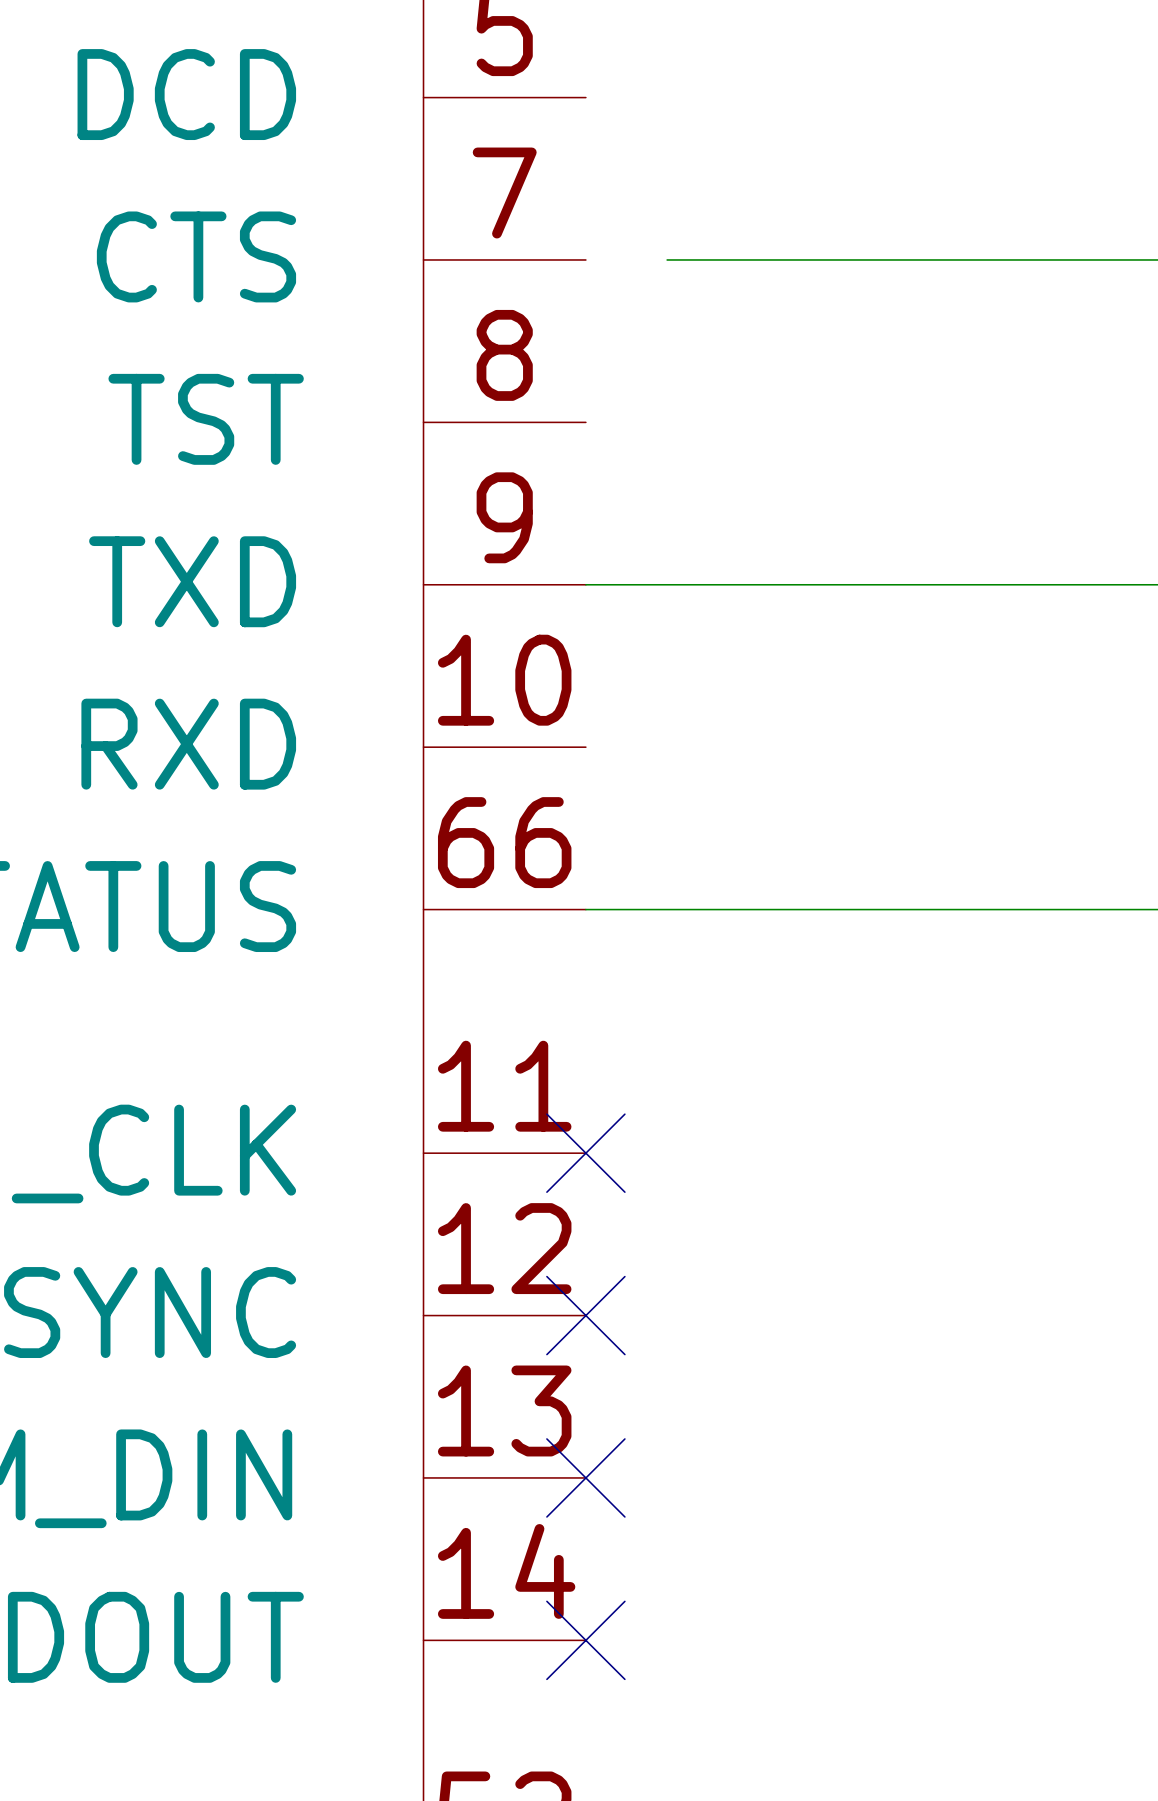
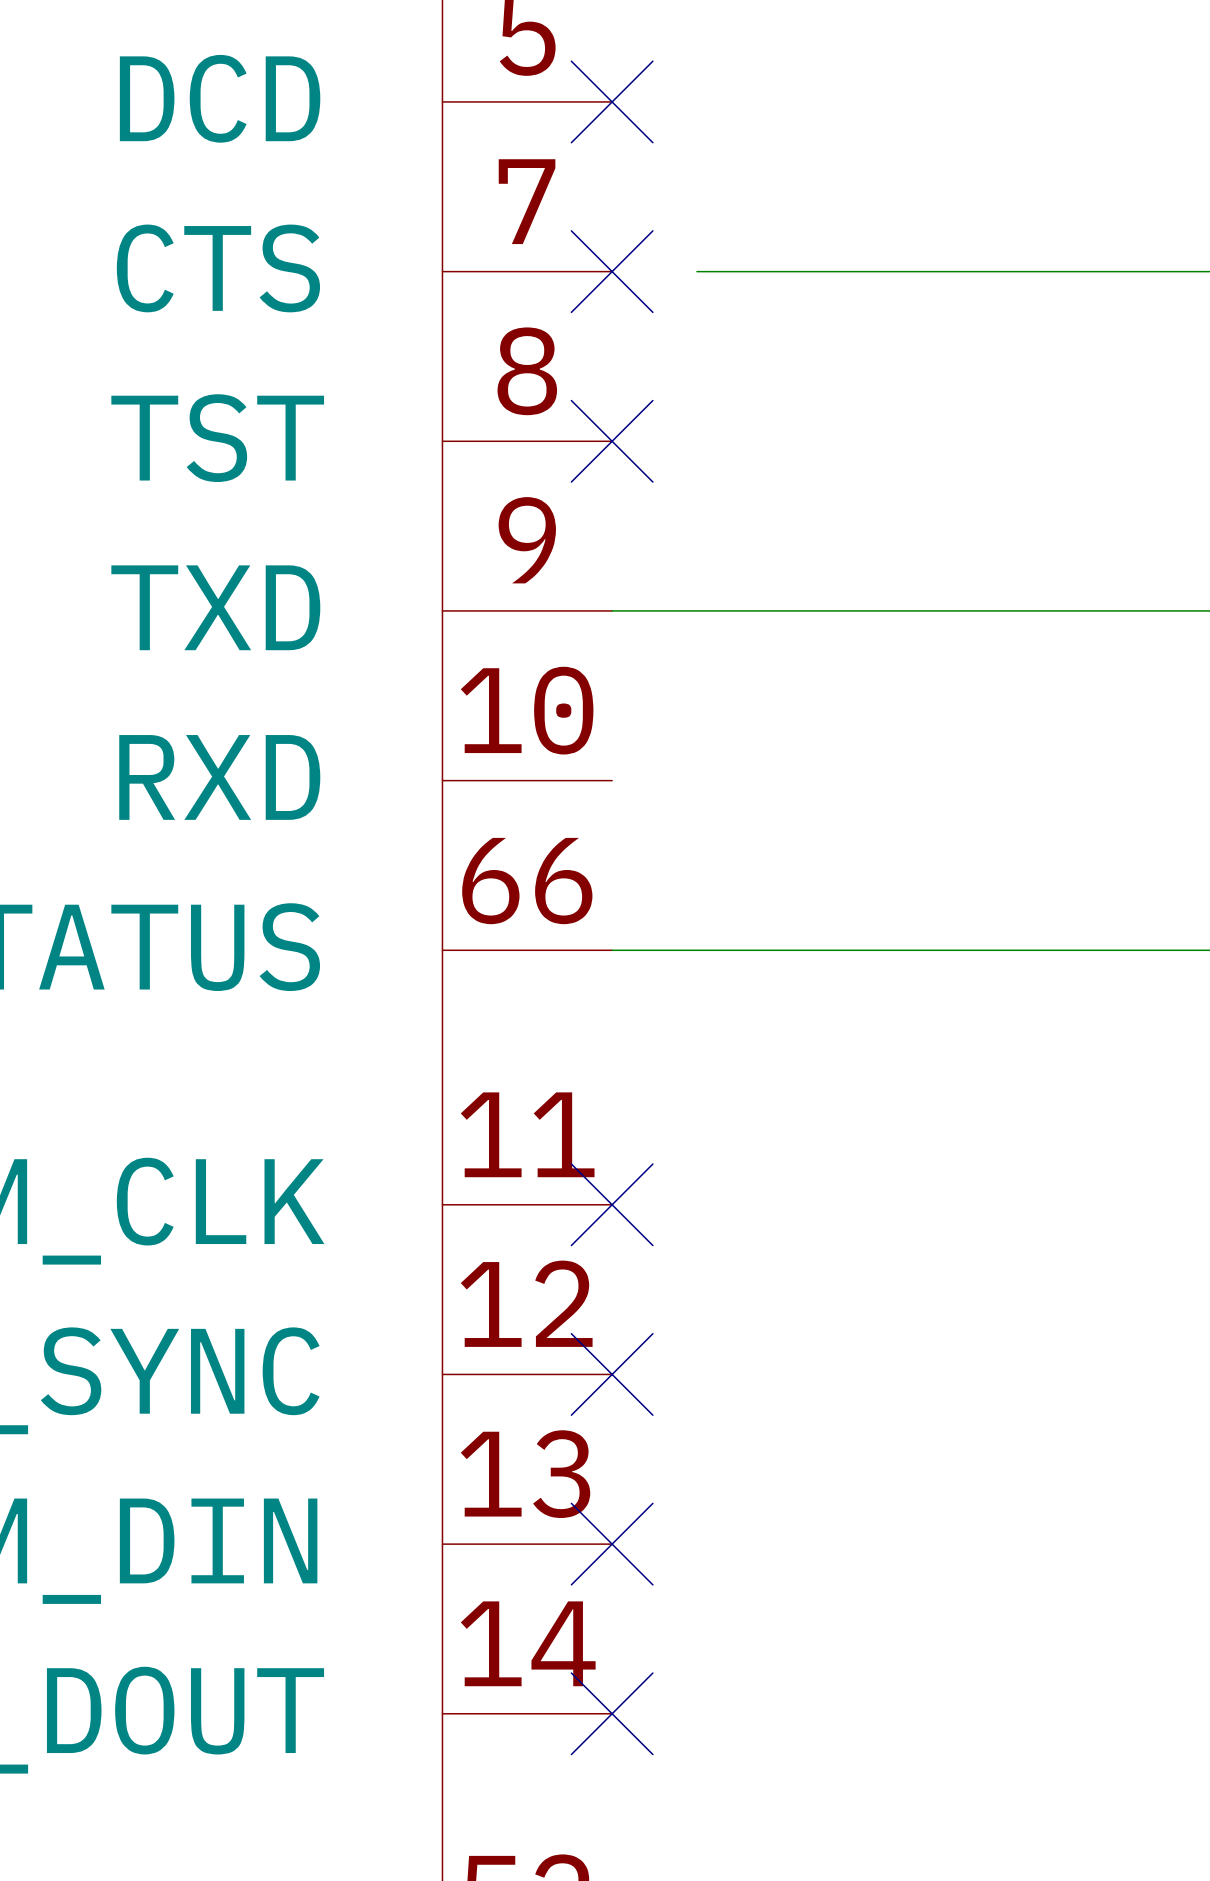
no-connect mark: none -> (612, 101)
no-connect mark: none -> (612, 271)
no-connect mark: none -> (612, 441)

